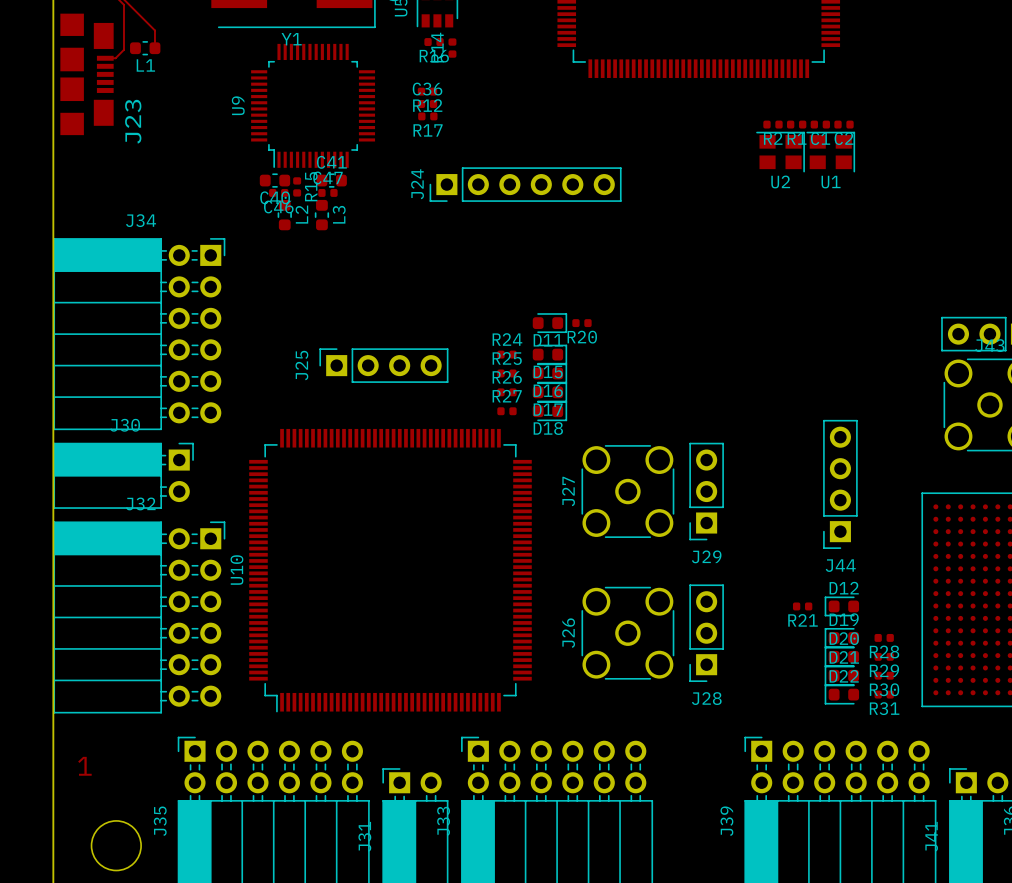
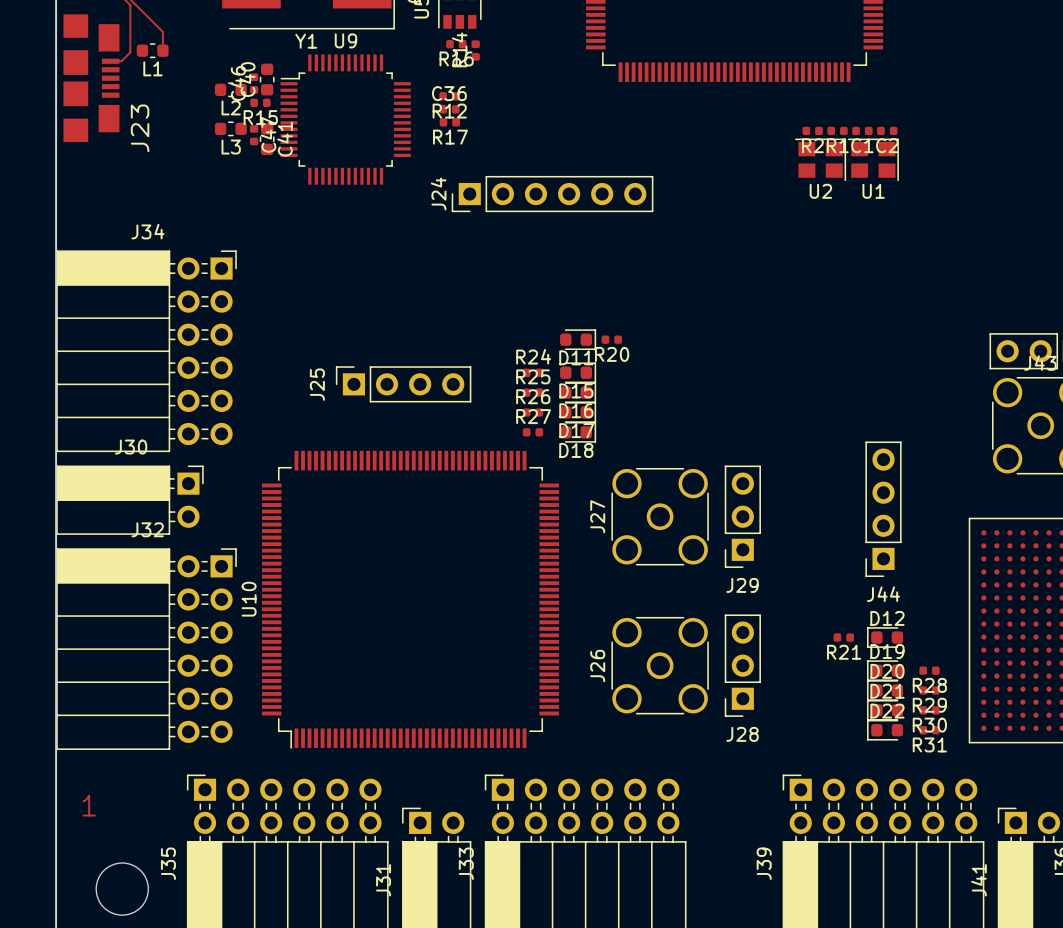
U9 rotation: 0° (313, 105) -> 90° clockwise (345, 119)
C40 rotation: 0° (274, 180) -> 90° clockwise (267, 79)
C40 position: (274, 180) -> (267, 79)
C41 rotation: 0° (331, 180) -> 90° clockwise (267, 139)
C41 position: (331, 180) -> (267, 139)
R15 rotation: 0° (297, 186) -> 90° clockwise (260, 102)
R15 position: (297, 186) -> (260, 102)
C46 rotation: 0° (278, 192) -> 90° clockwise (254, 83)
C46 position: (278, 192) -> (254, 83)
C47 rotation: 0° (327, 192) -> 90° clockwise (254, 135)
C47 position: (327, 192) -> (254, 135)
L2 rotation: 0° (284, 215) -> 90° clockwise (230, 89)
L2 position: (284, 215) -> (230, 89)
L3 rotation: 0° (321, 215) -> 90° clockwise (230, 128)
L3 position: (321, 215) -> (230, 128)

